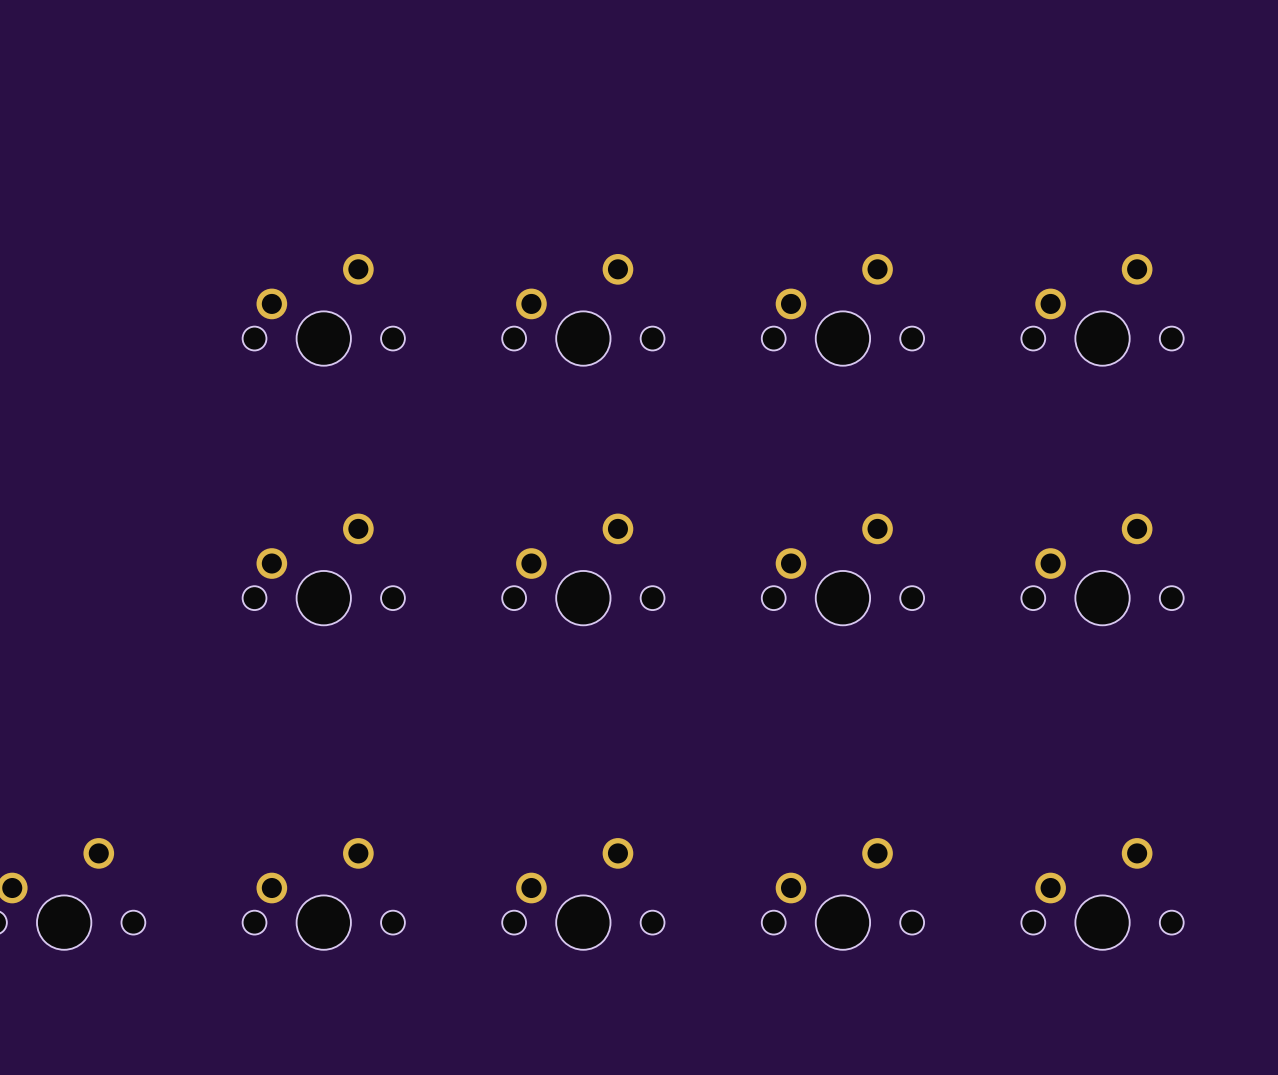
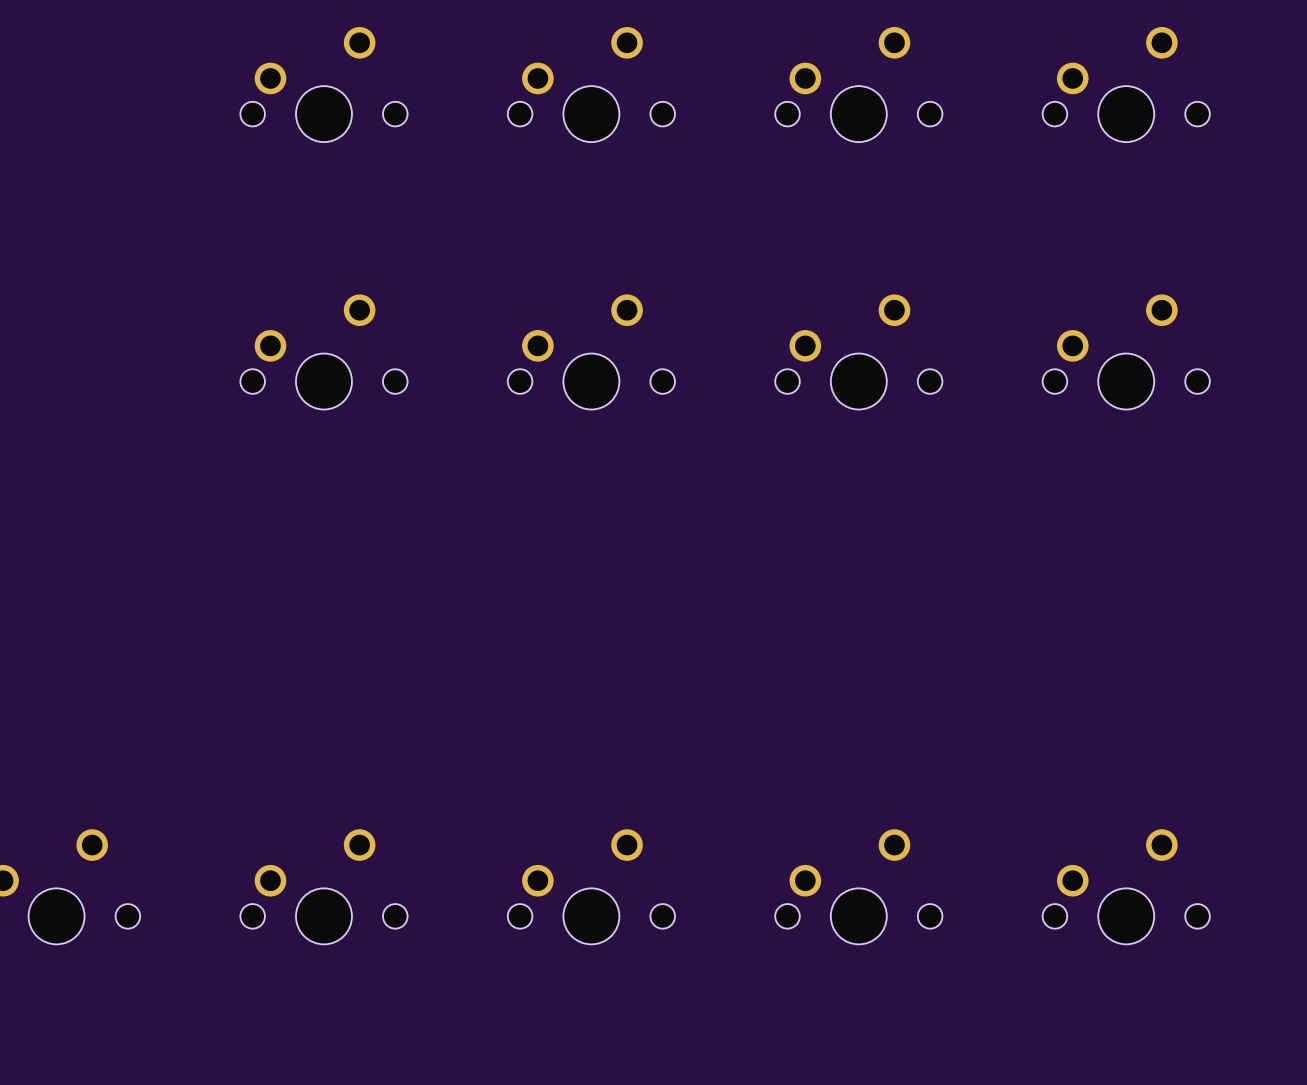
part: none -> (323, 84)
part: none -> (591, 84)
part: none -> (858, 84)
part: none -> (1126, 84)
part position: (323, 309) -> (323, 351)
part position: (583, 309) -> (591, 351)
part position: (842, 309) -> (858, 351)
part position: (1102, 309) -> (1126, 351)
part: (323, 569) -> none
part: (583, 569) -> none
part: (842, 569) -> none
part: (1102, 569) -> none

